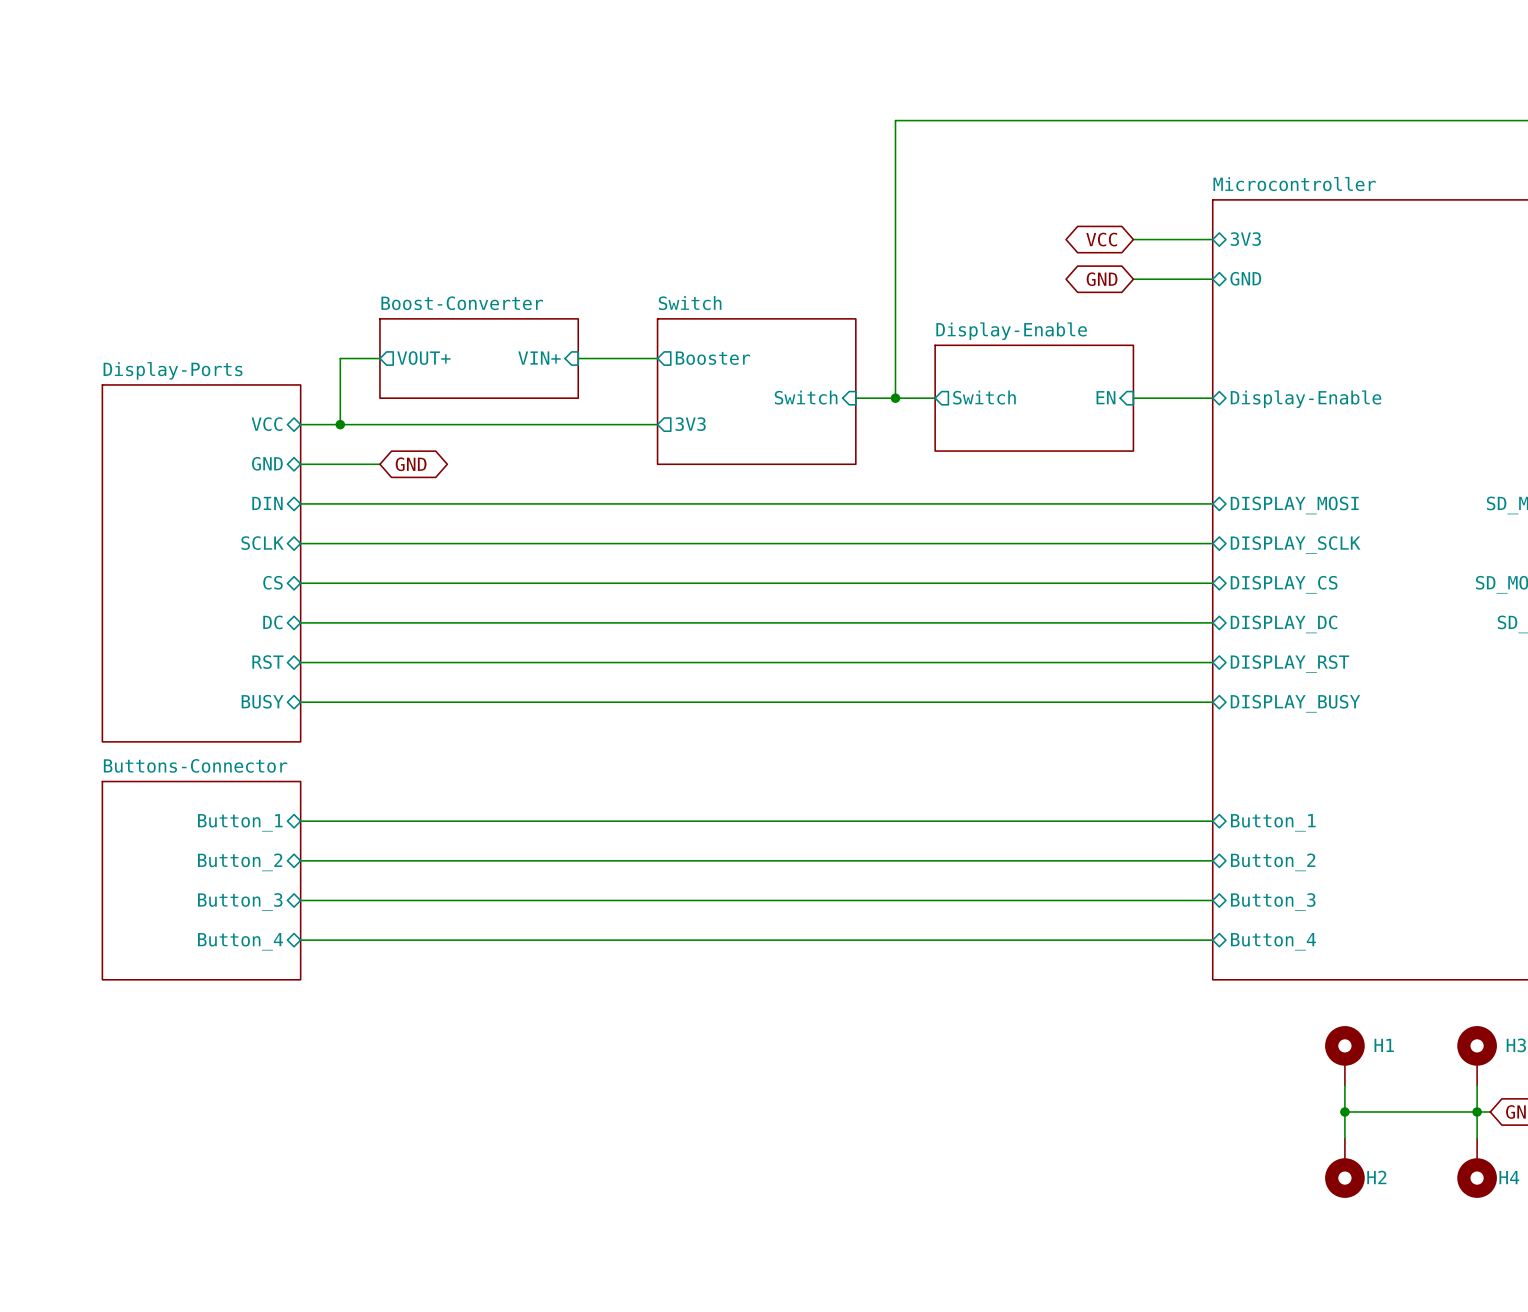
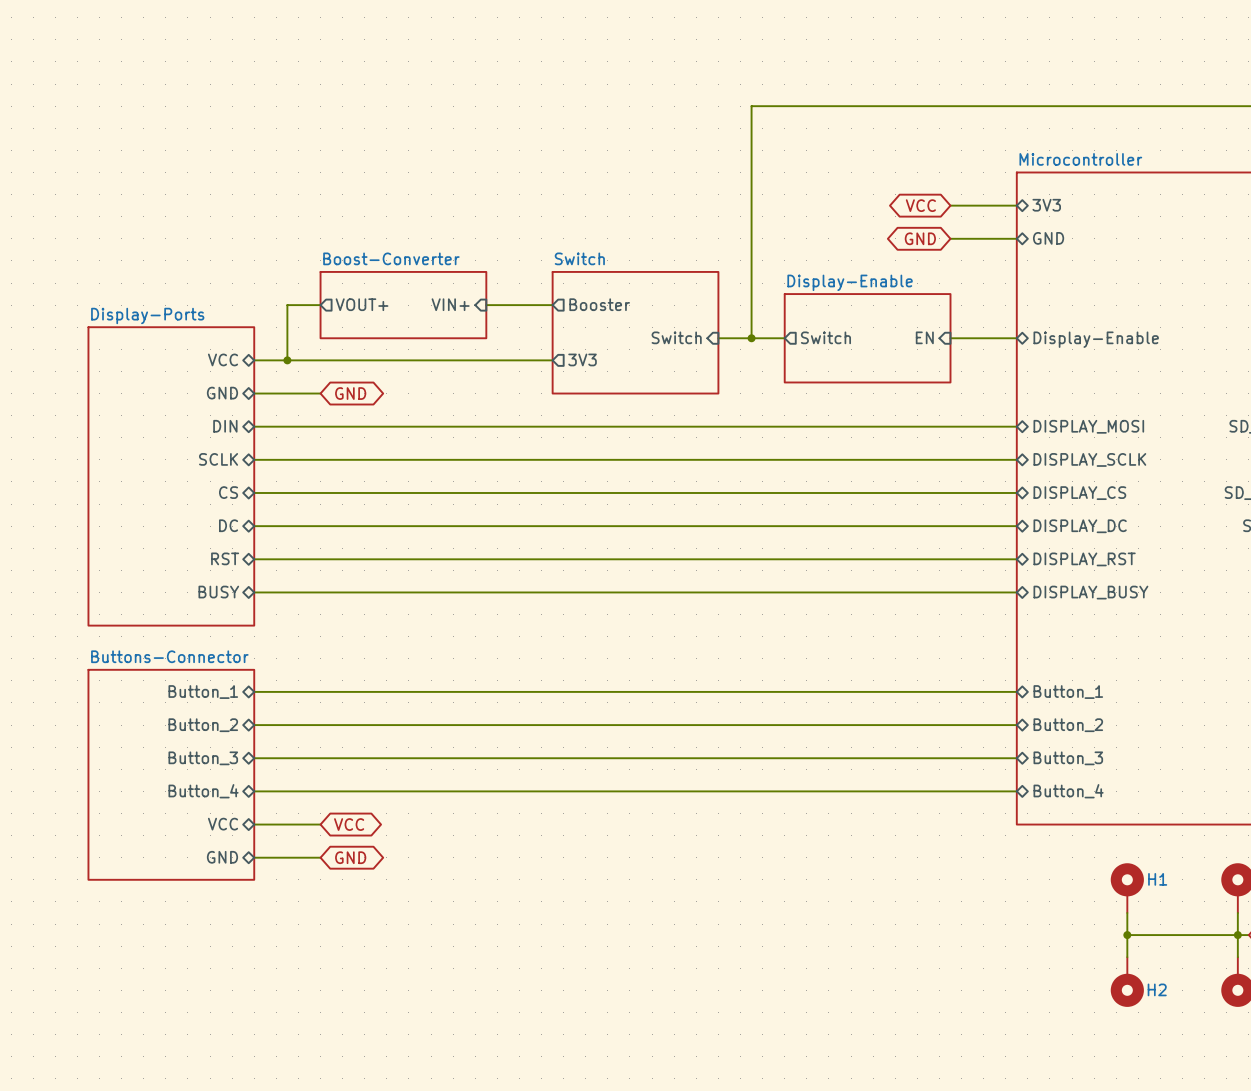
sheet Buttons-Connector: (201, 880) -> none
sheet Buttons-Connector: none -> (171, 774)
sheet pin: none -> VCC (223, 824)
wire: none -> (254, 824) (320, 824)
global label: none -> VCC (349, 824)
sheet pin: none -> GND (222, 857)
wire: none -> (254, 857) (320, 857)
global label: none -> GND (350, 857)

